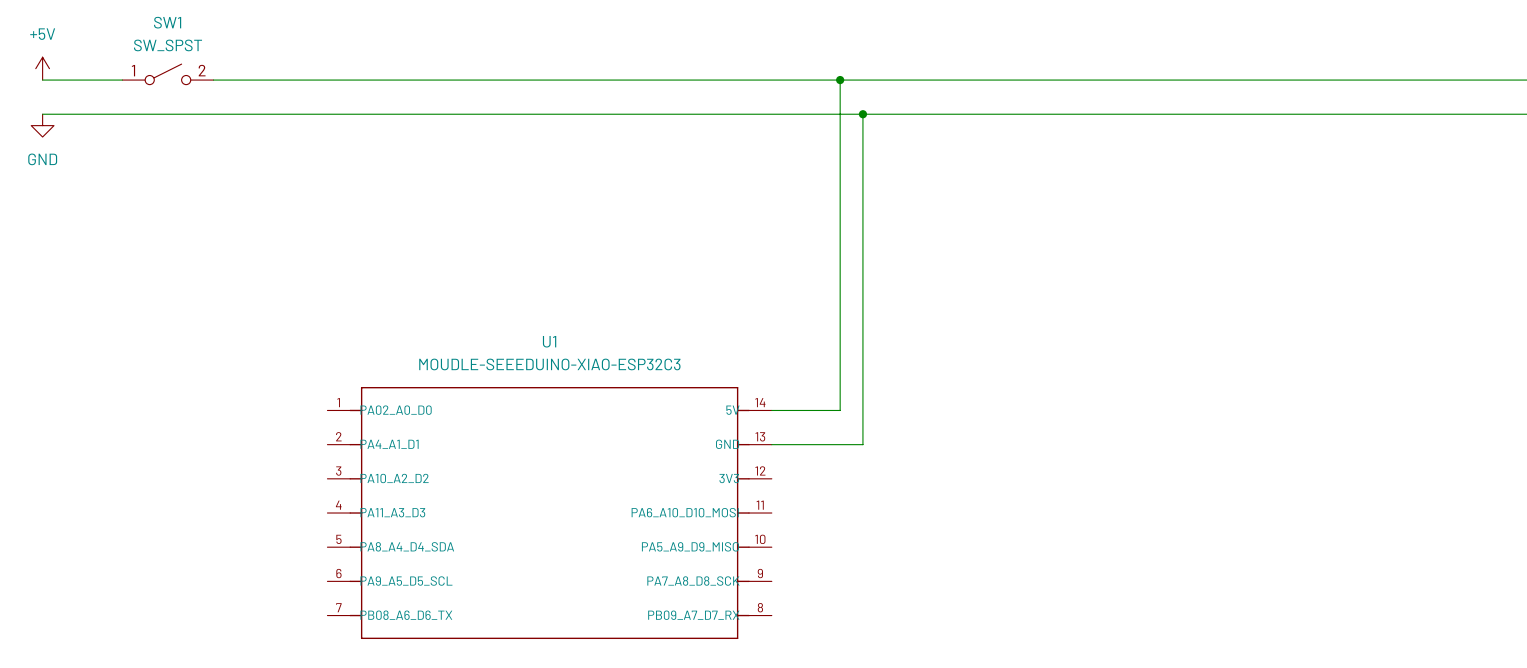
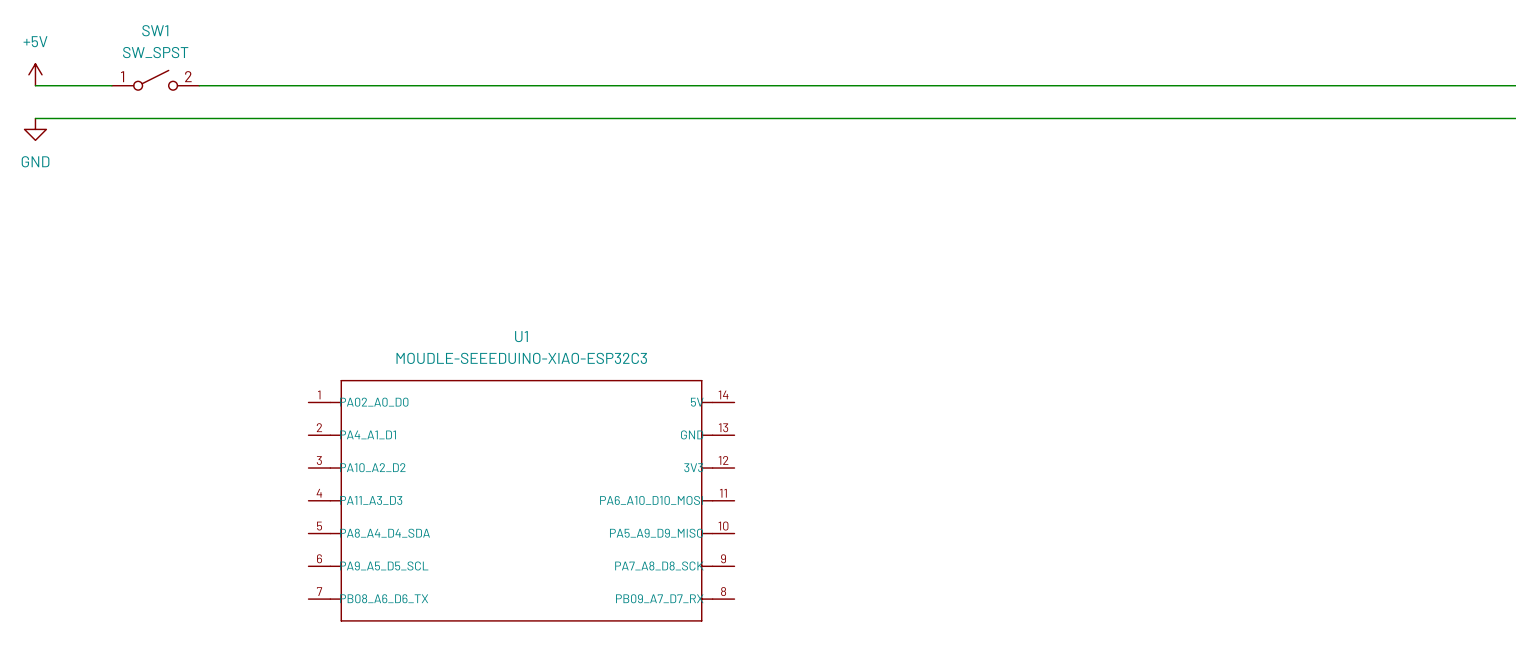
wire: (840, 80) (840, 410) (771, 410) -> none
junction: (840, 80) -> none
wire: (862, 114) (862, 444) (771, 444) -> none
junction: (862, 114) -> none

